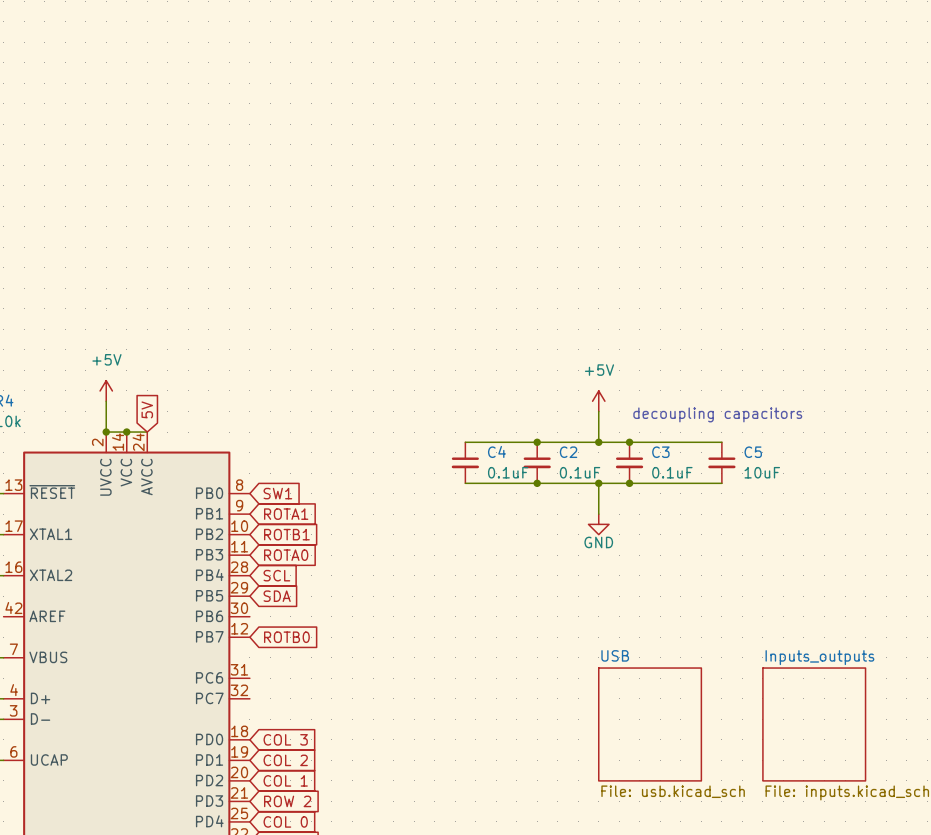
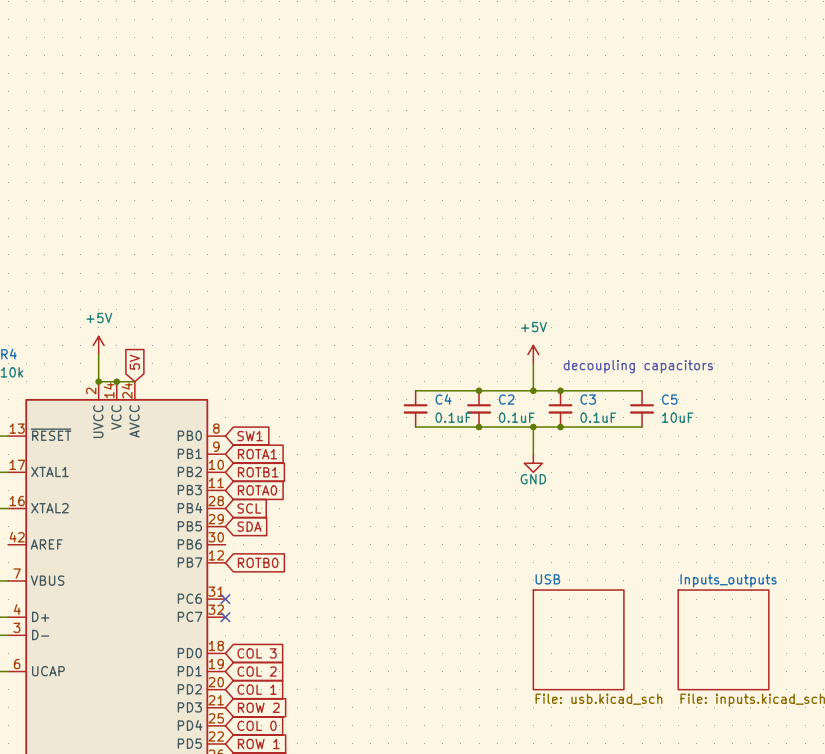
no-connect mark: none -> (225, 599)
no-connect mark: none -> (225, 617)

